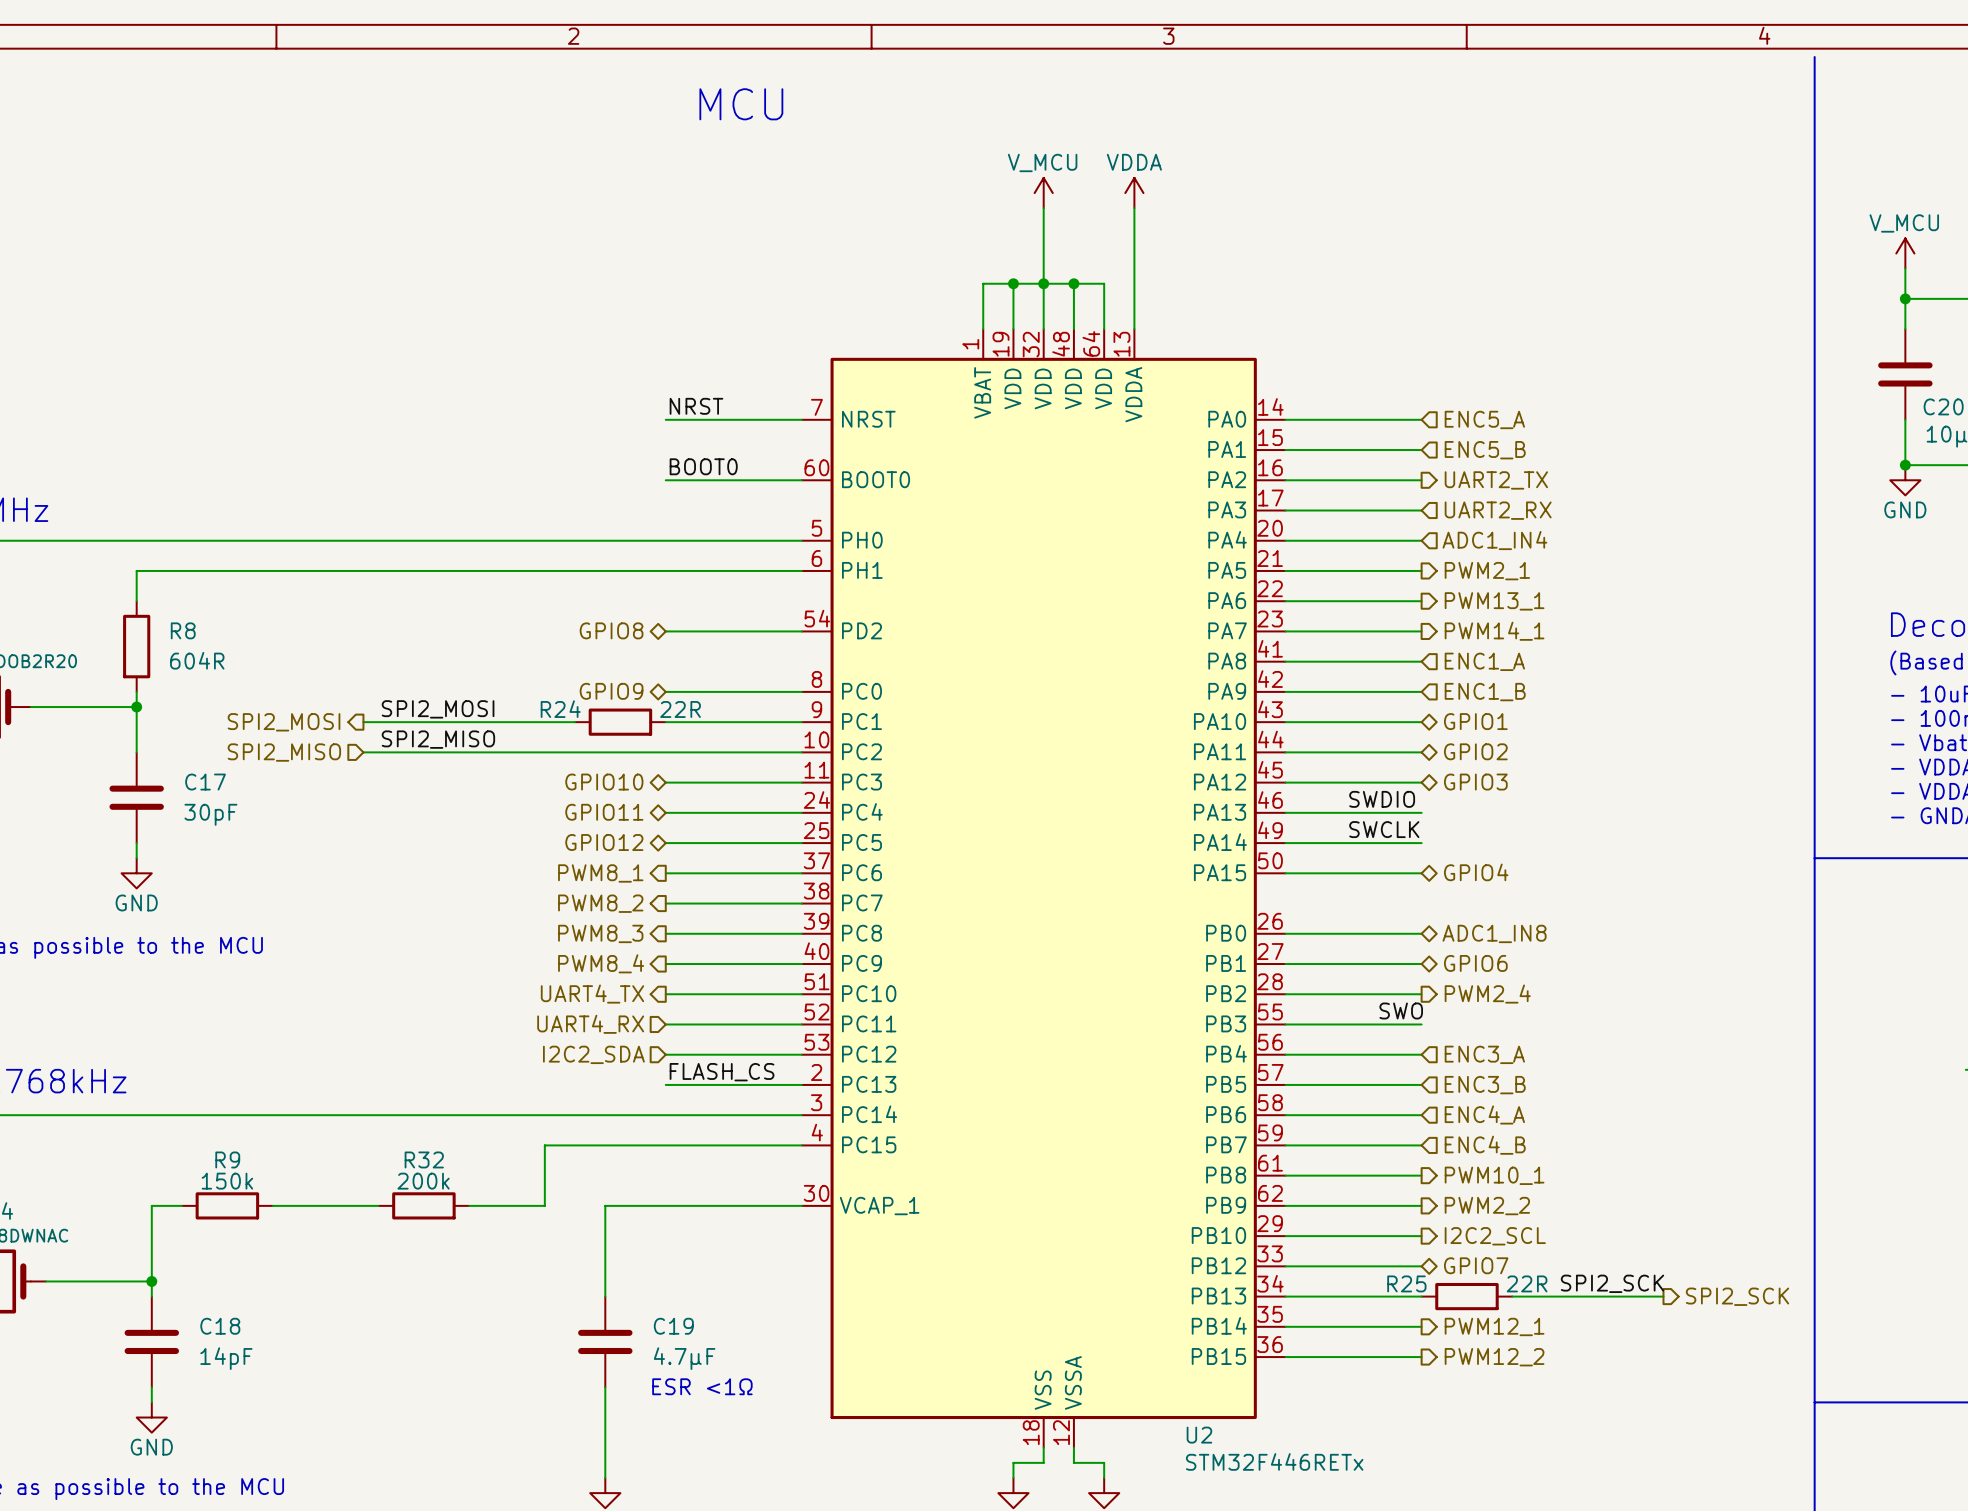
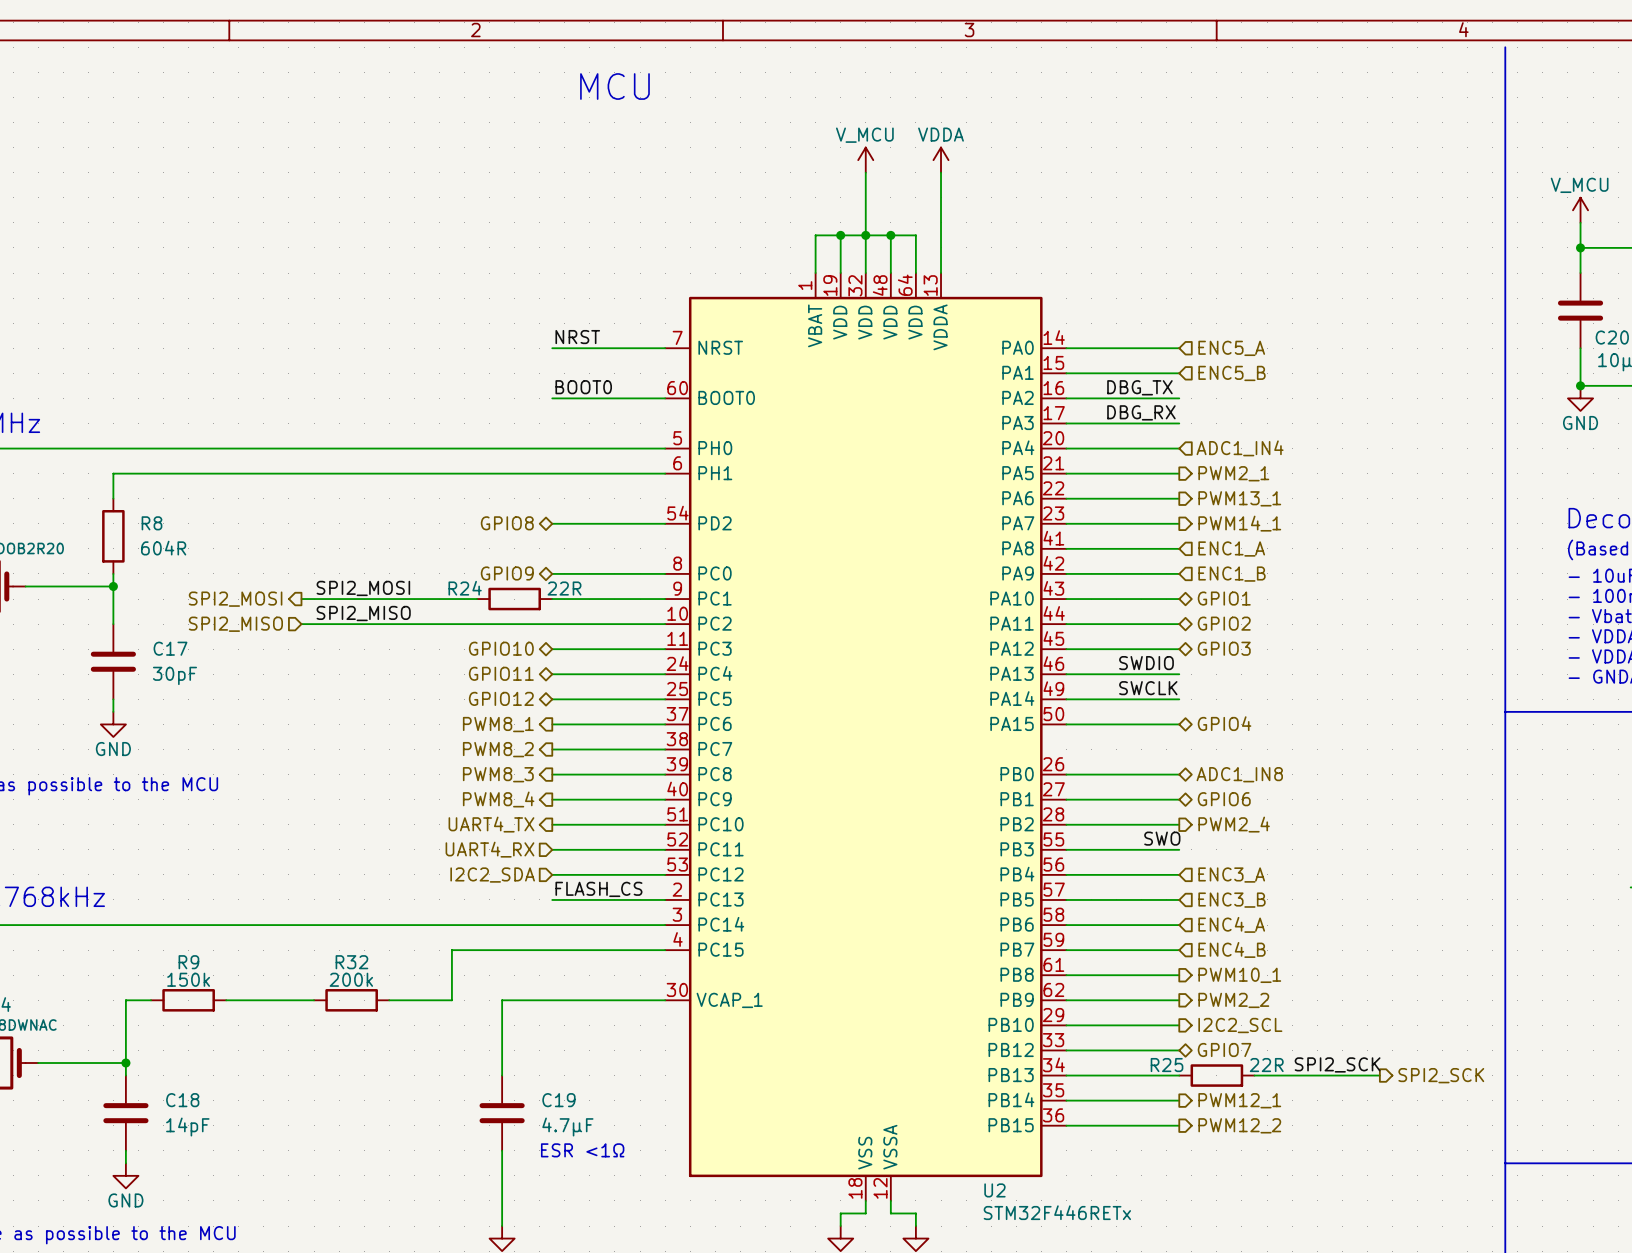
label: none -> DBG_TX (1139, 387)
hierarchical label: UART2_TX (1496, 480) -> none
label: none -> DBG_RX (1141, 412)
hierarchical label: UART2_RX (1498, 510) -> none

